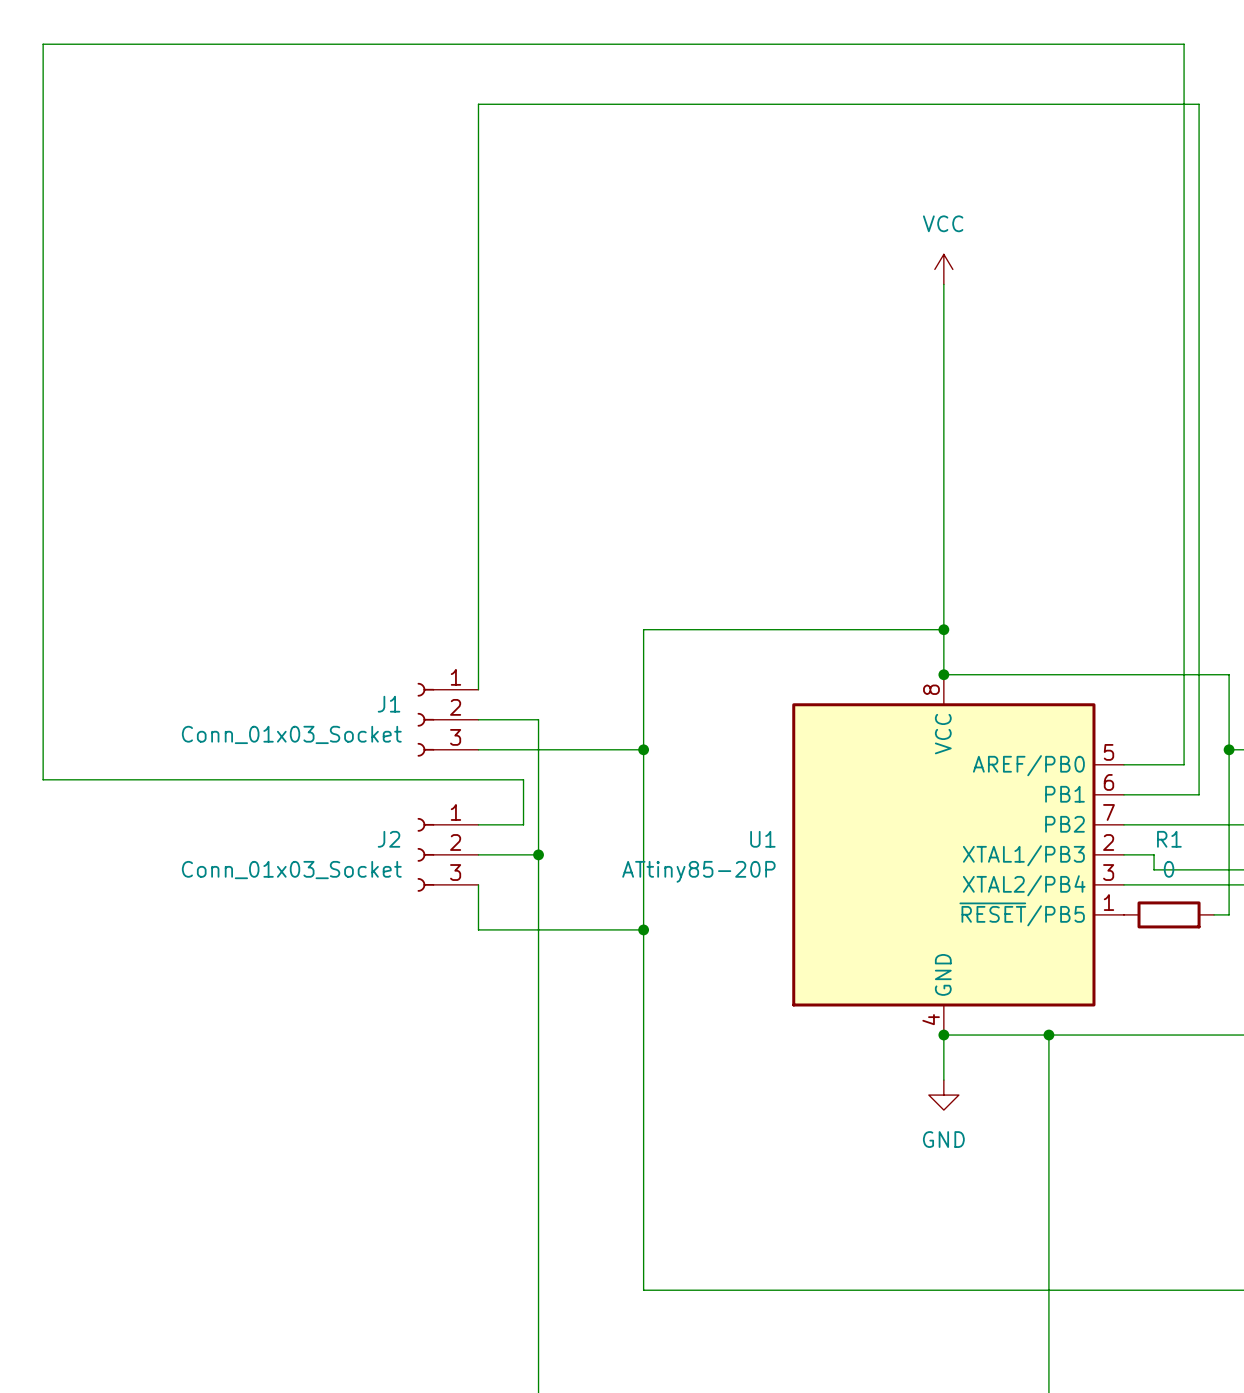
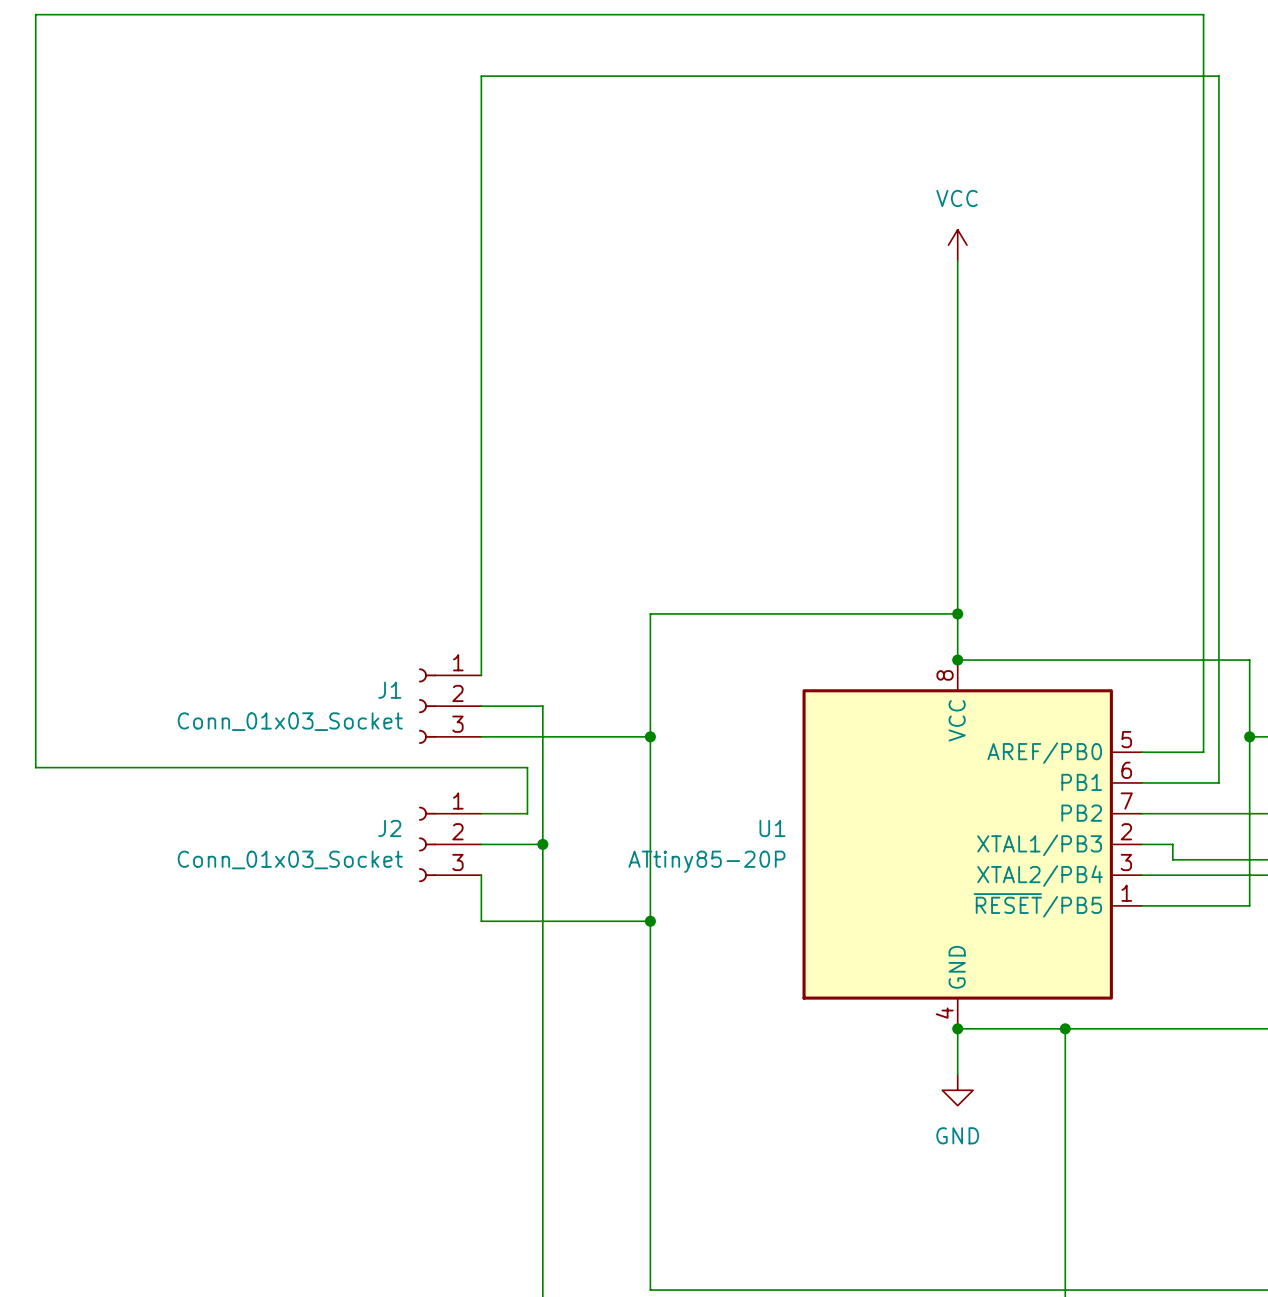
wire: none -> (1142, 905) (1234, 905)
R1: 0 (1169, 914) -> none

